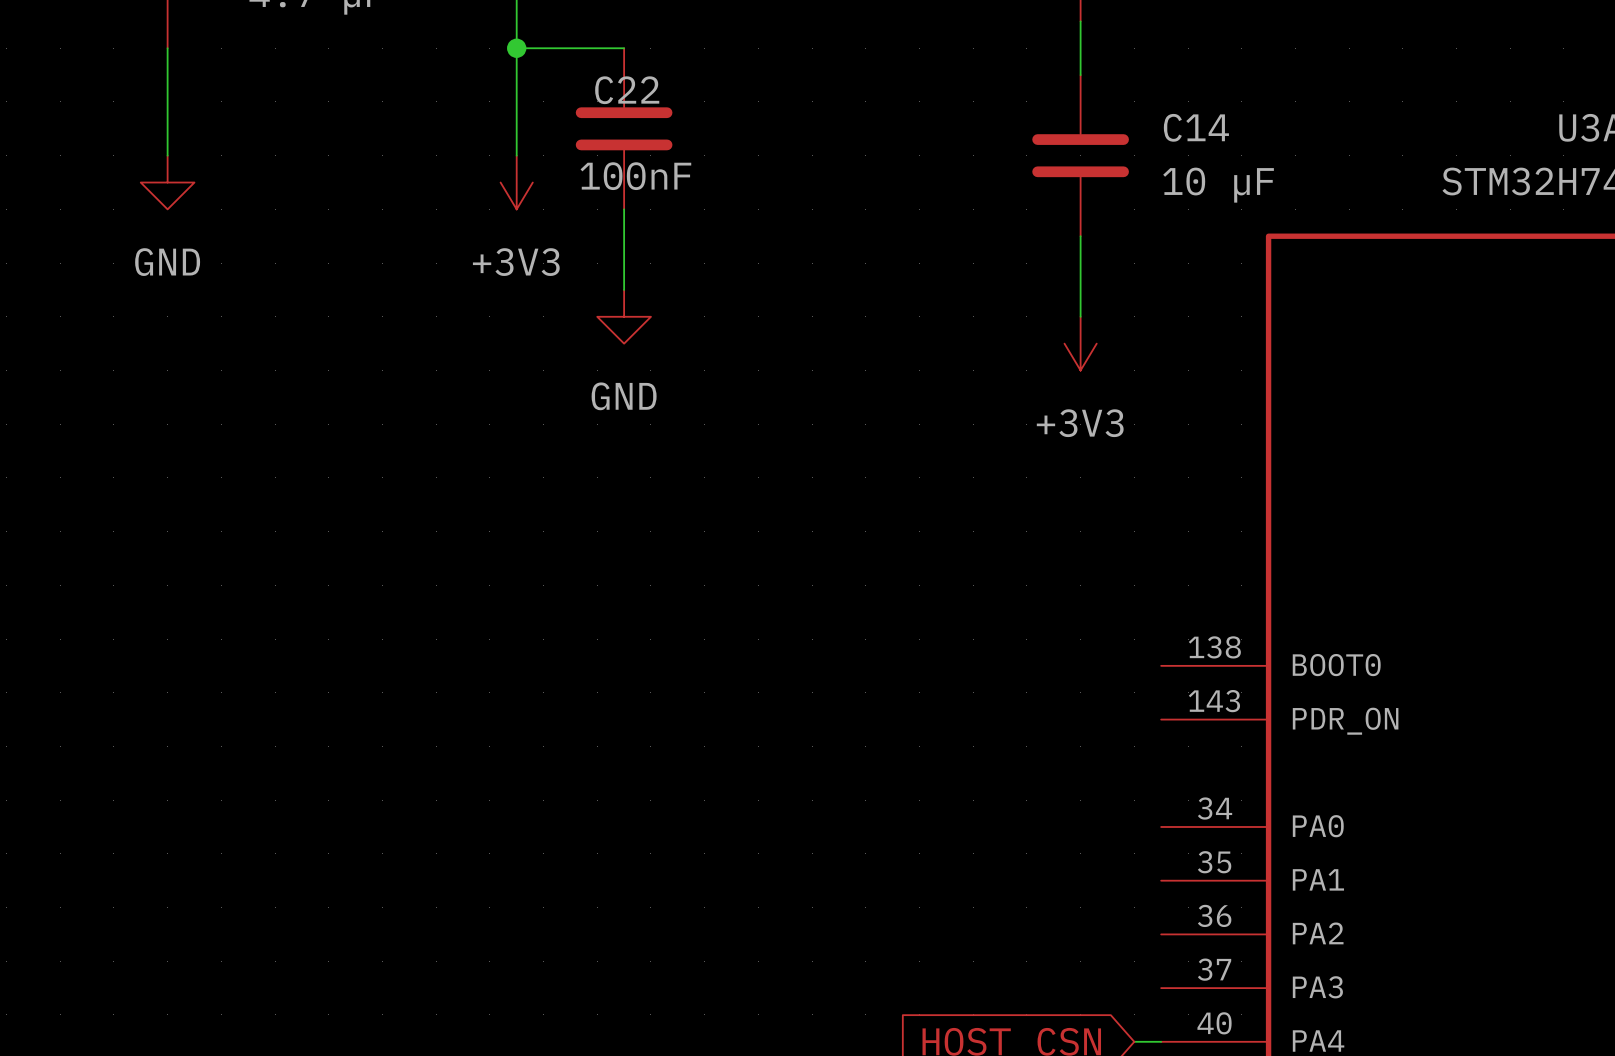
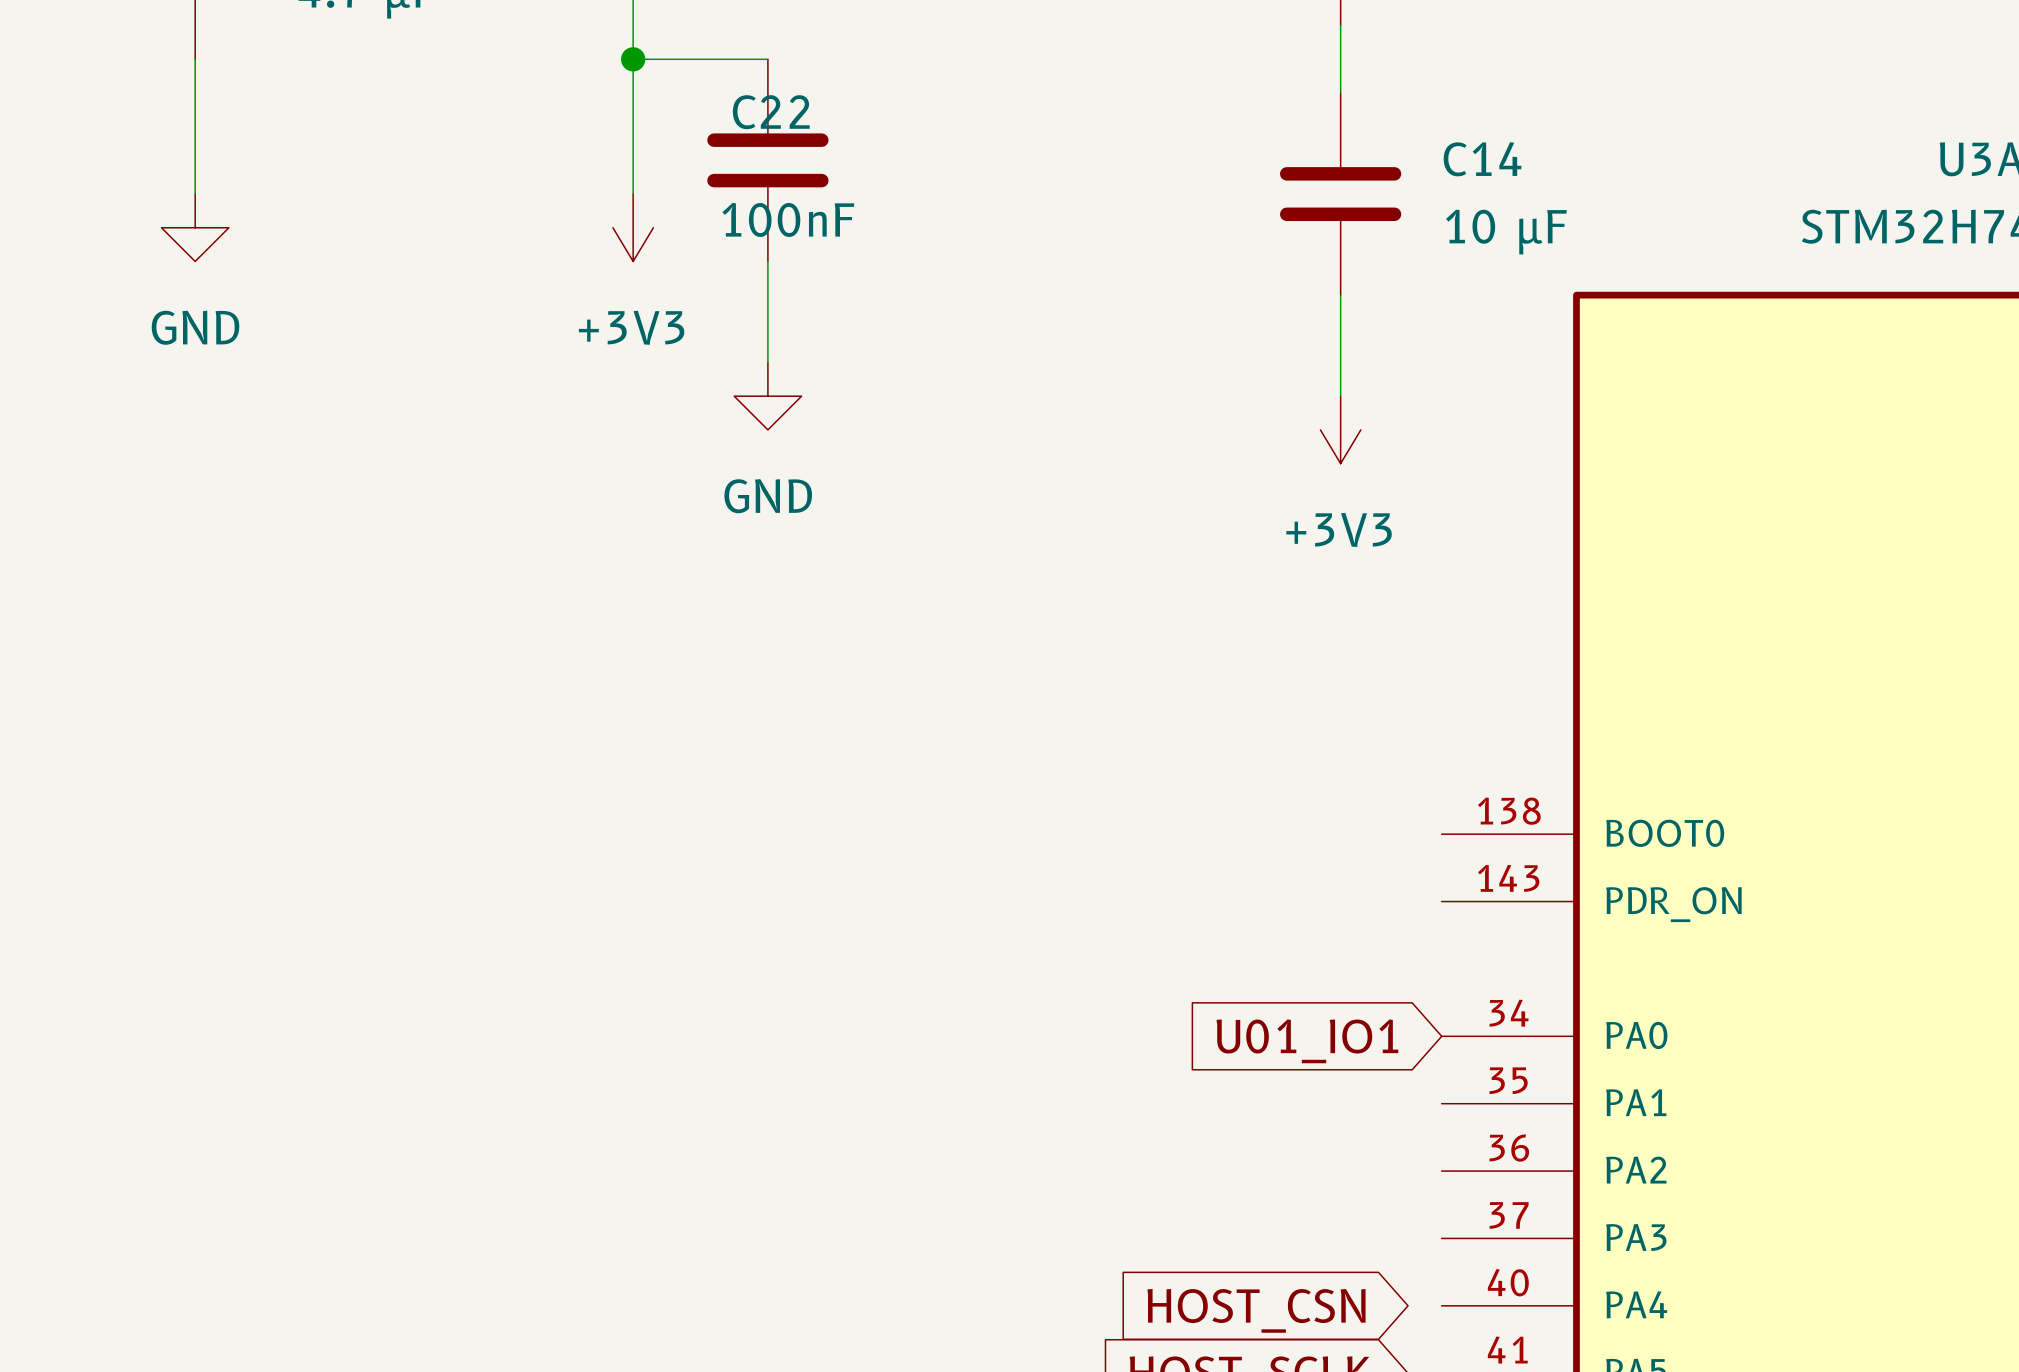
global label: none -> U01_IO1 (1307, 1041)
wire: (1134, 1041) (1161, 1041) -> none

